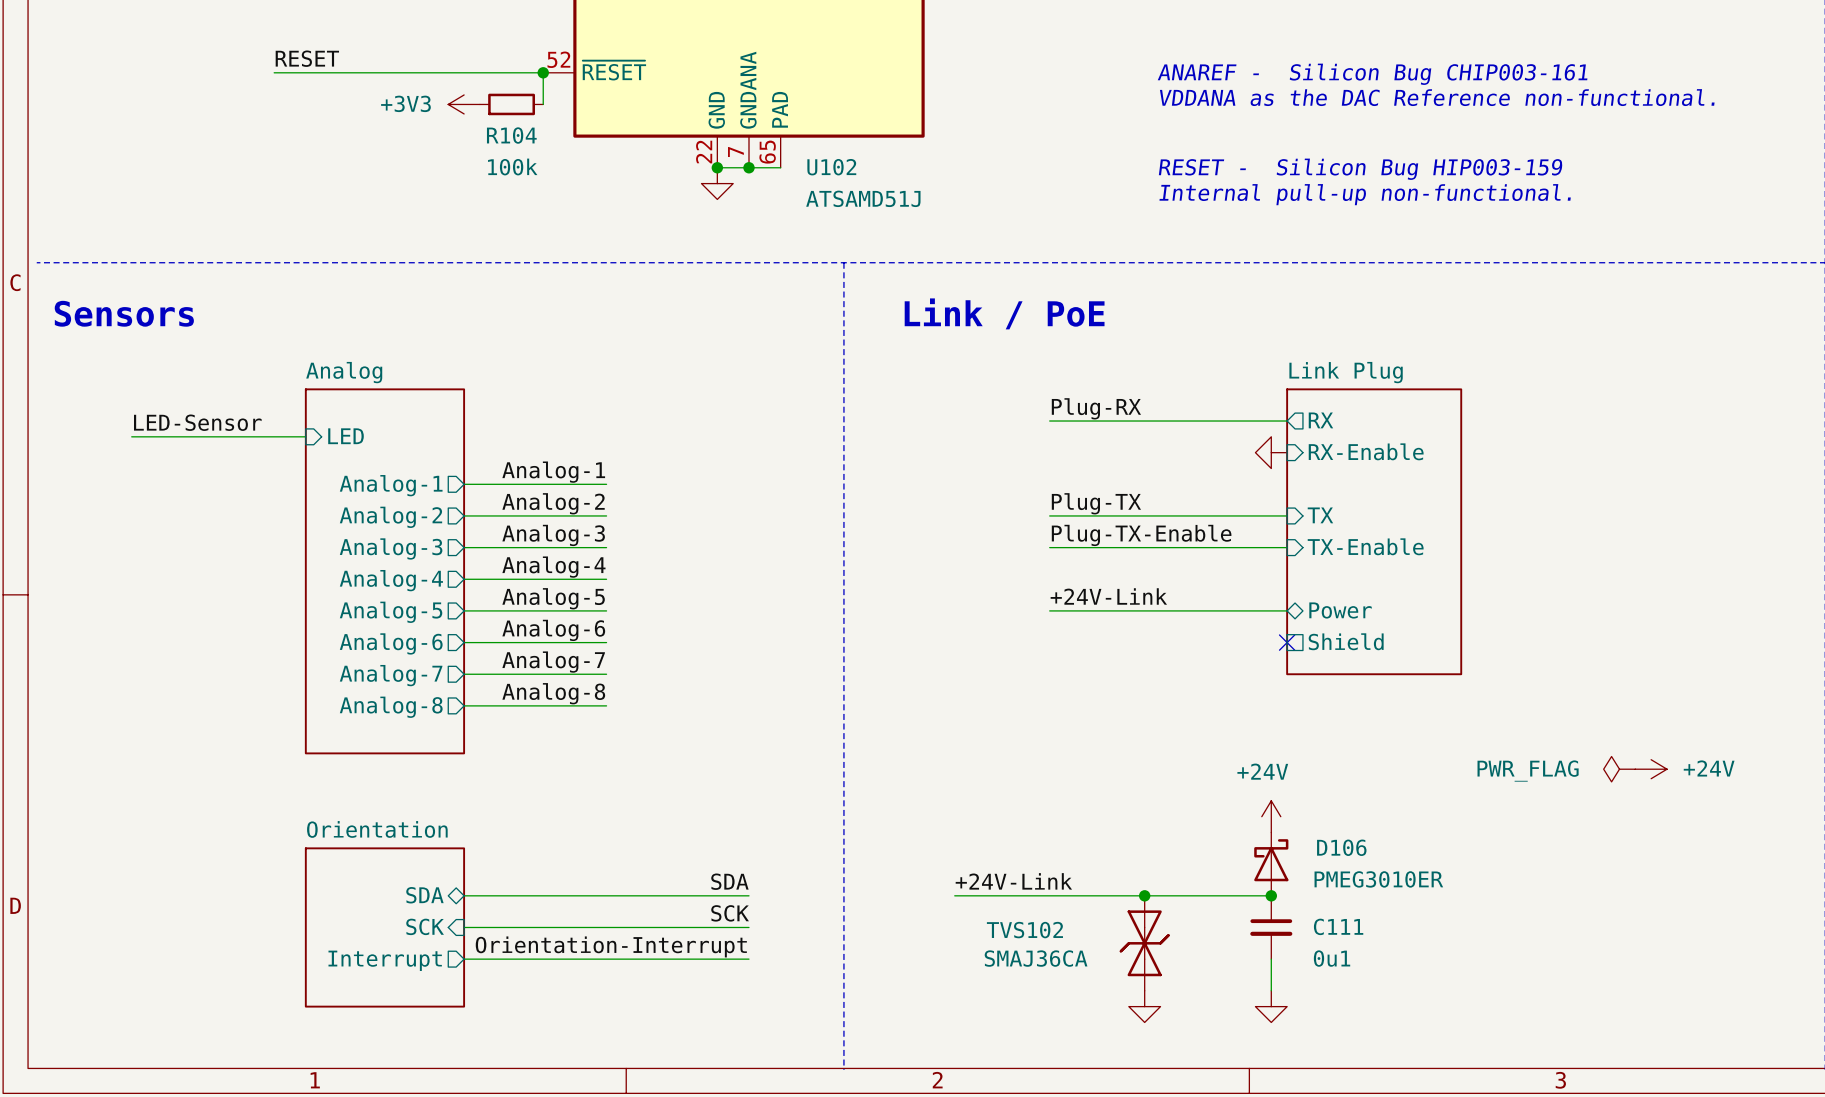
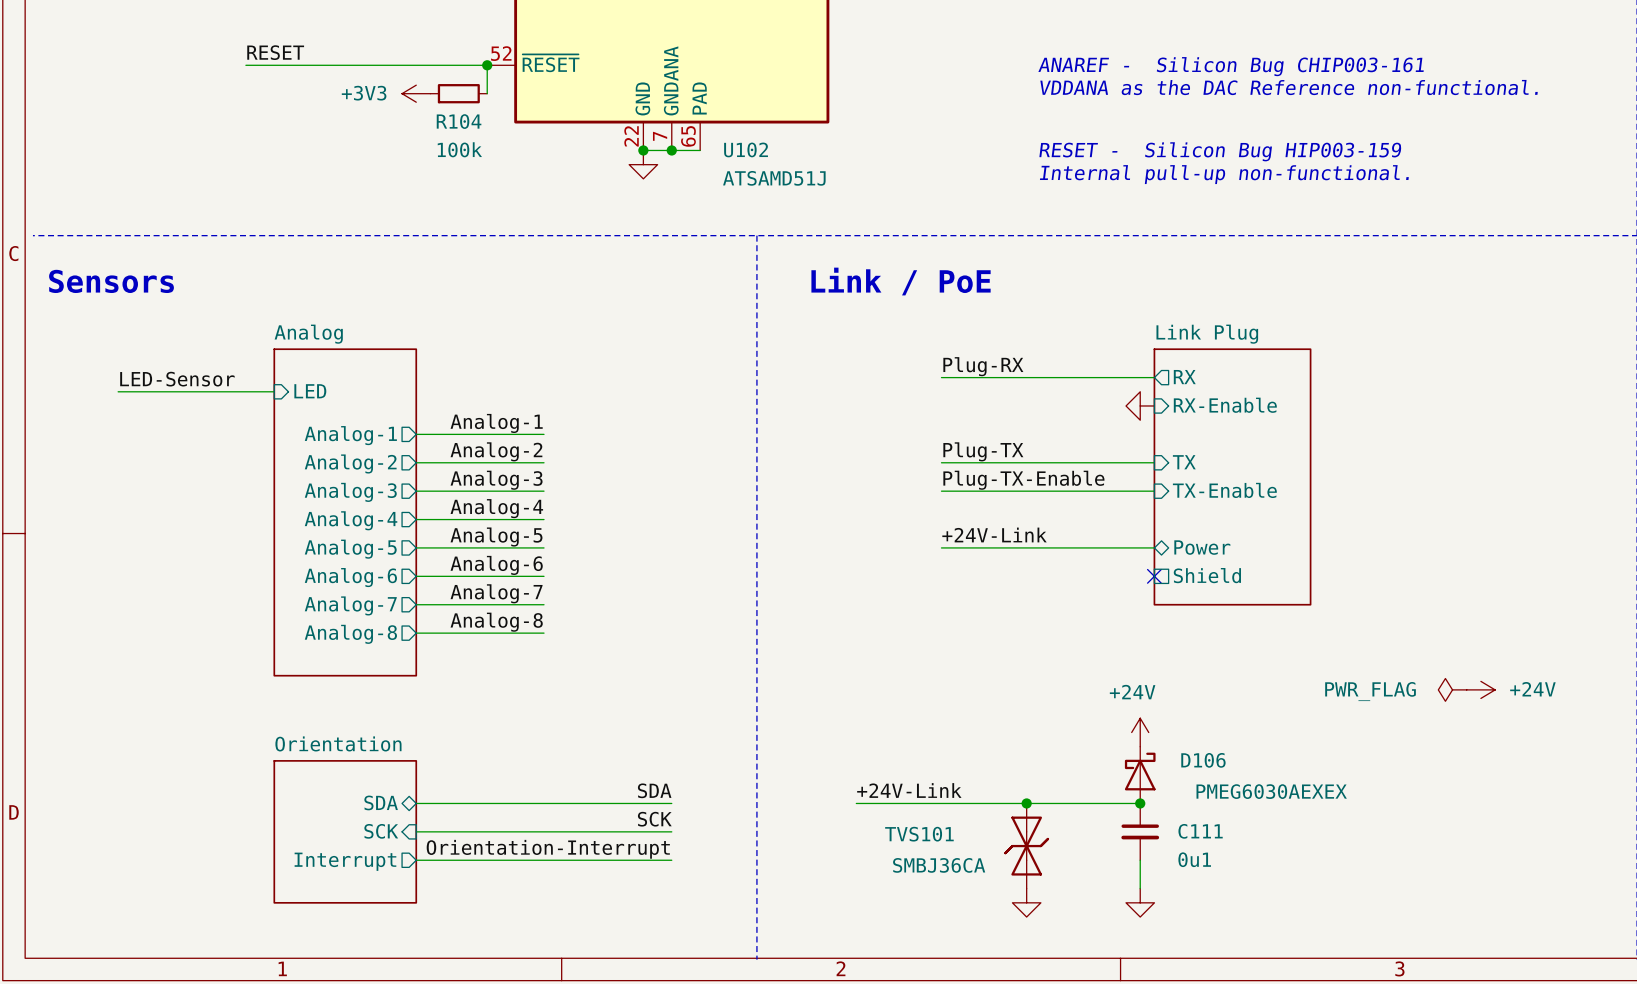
D106 value: PMEG3010ER (1378, 879) -> PMEG6030AEXEX (1271, 791)
TVS102 name: TVS102 (1024, 930) -> TVS101 (919, 834)
TVS102 value: SMAJ36CA (1036, 958) -> SMBJ36CA (939, 865)

